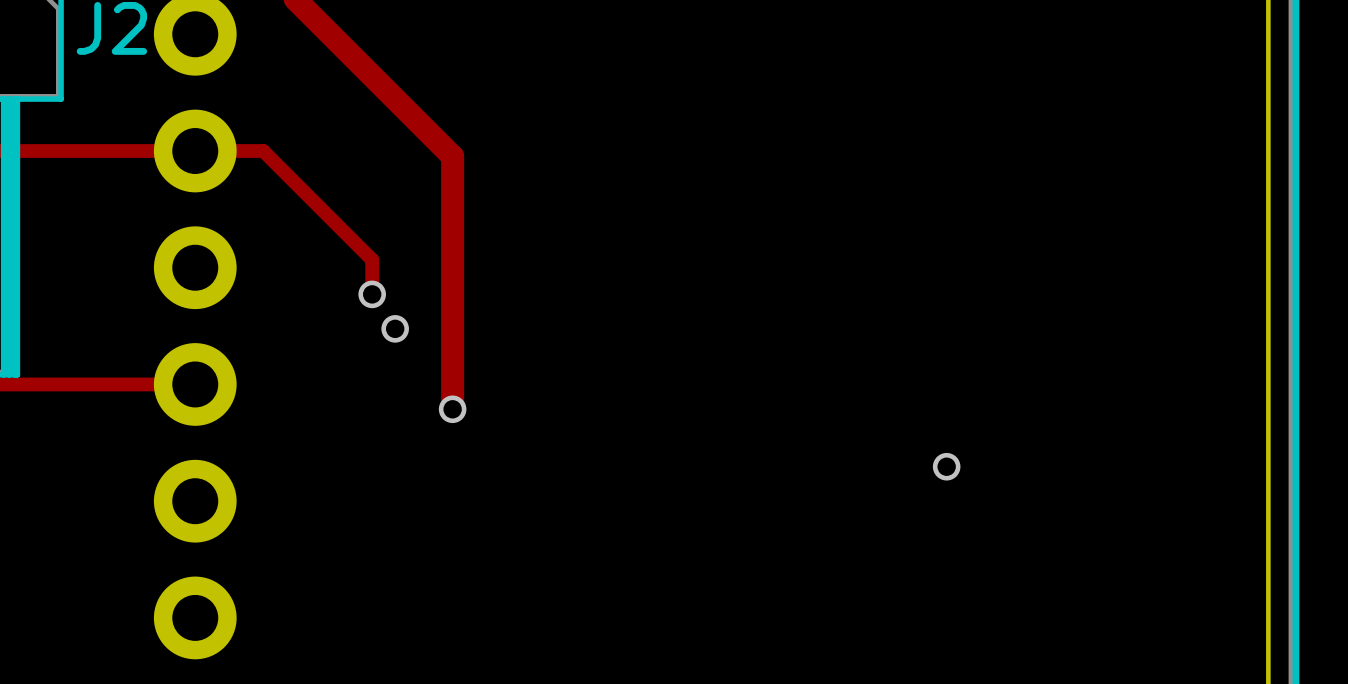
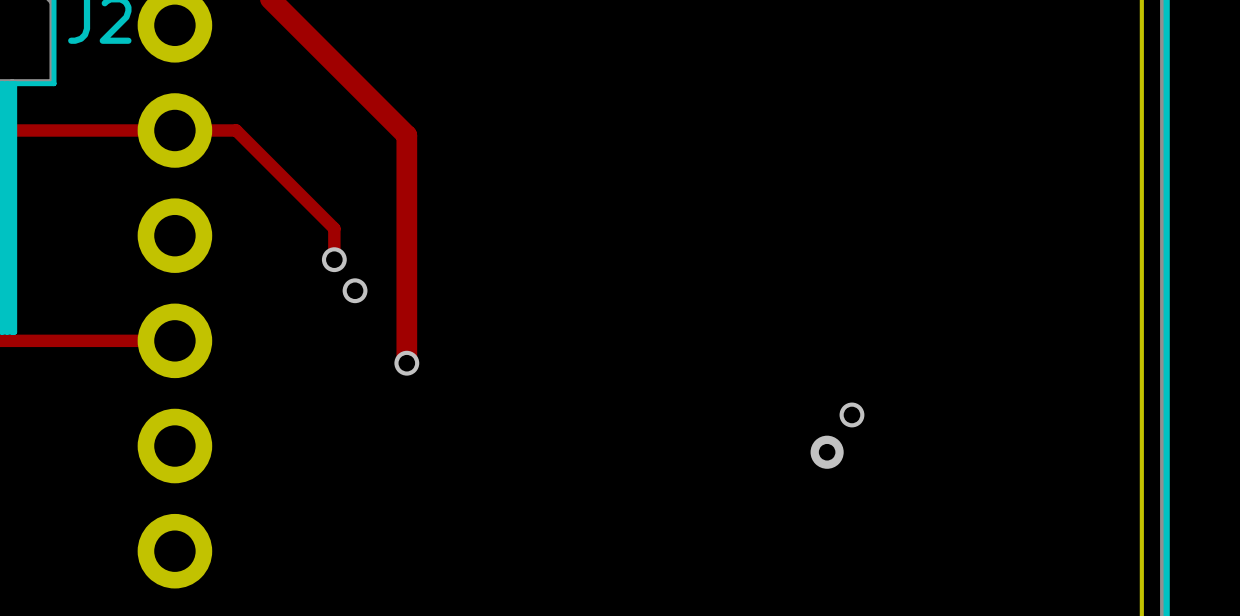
via: none -> (827, 452)

